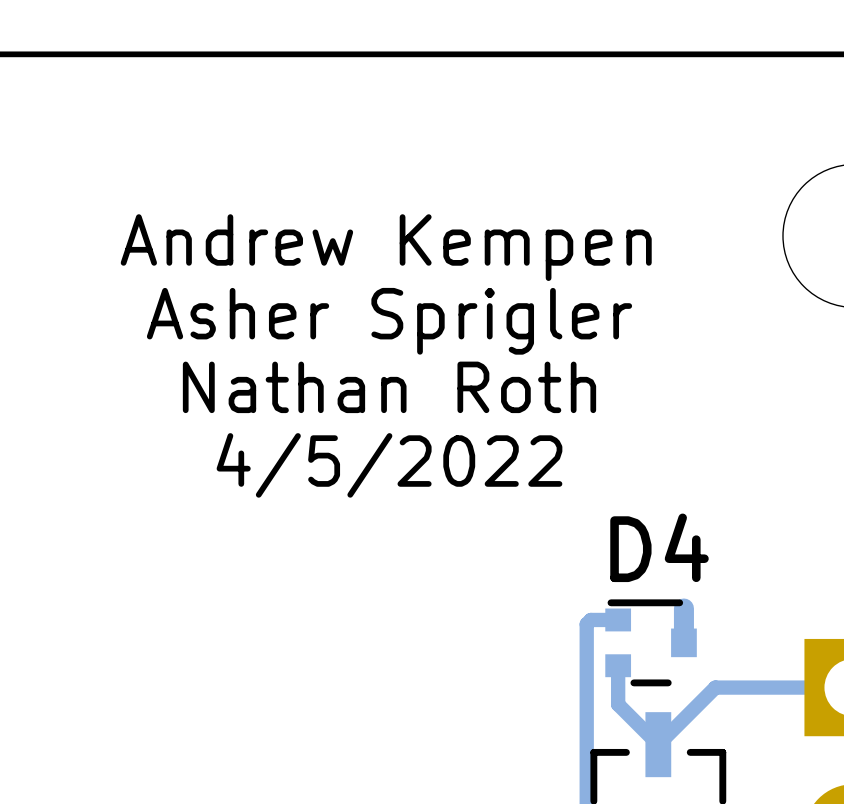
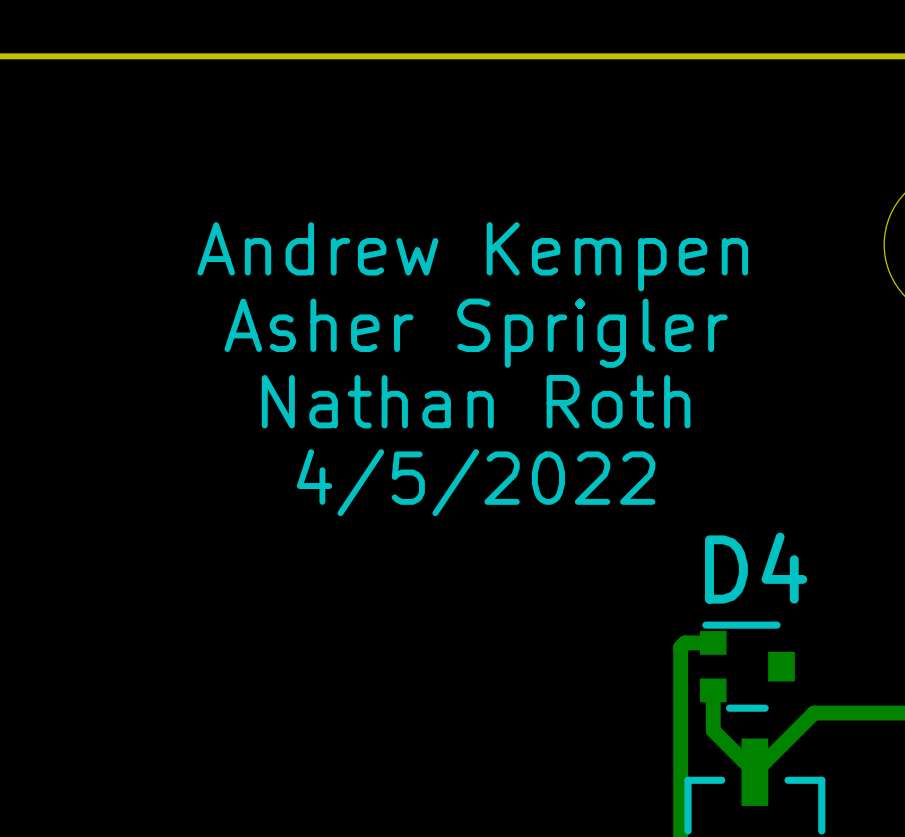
track: (683, 608) (683, 642) -> none

